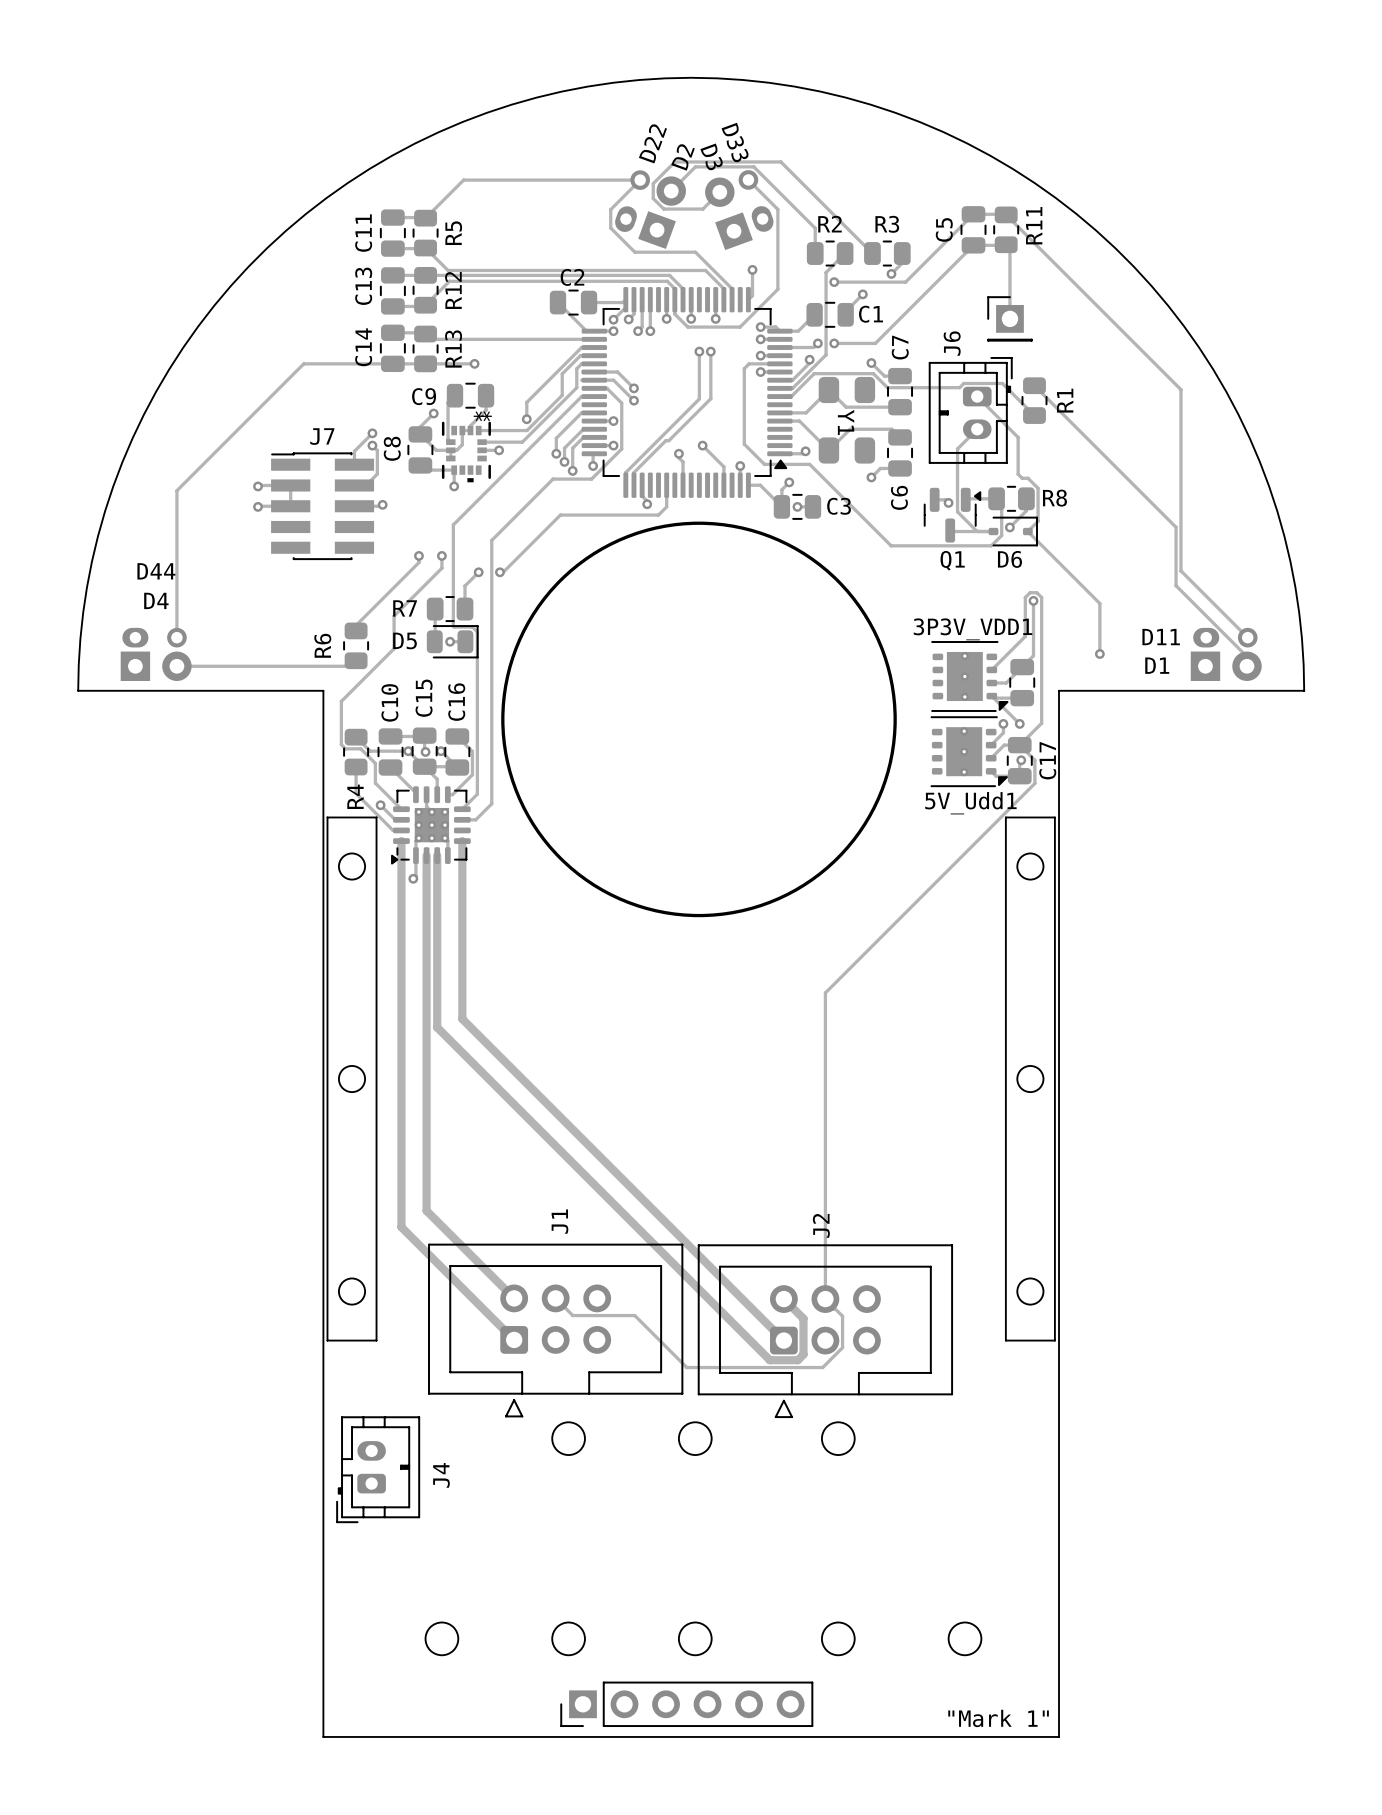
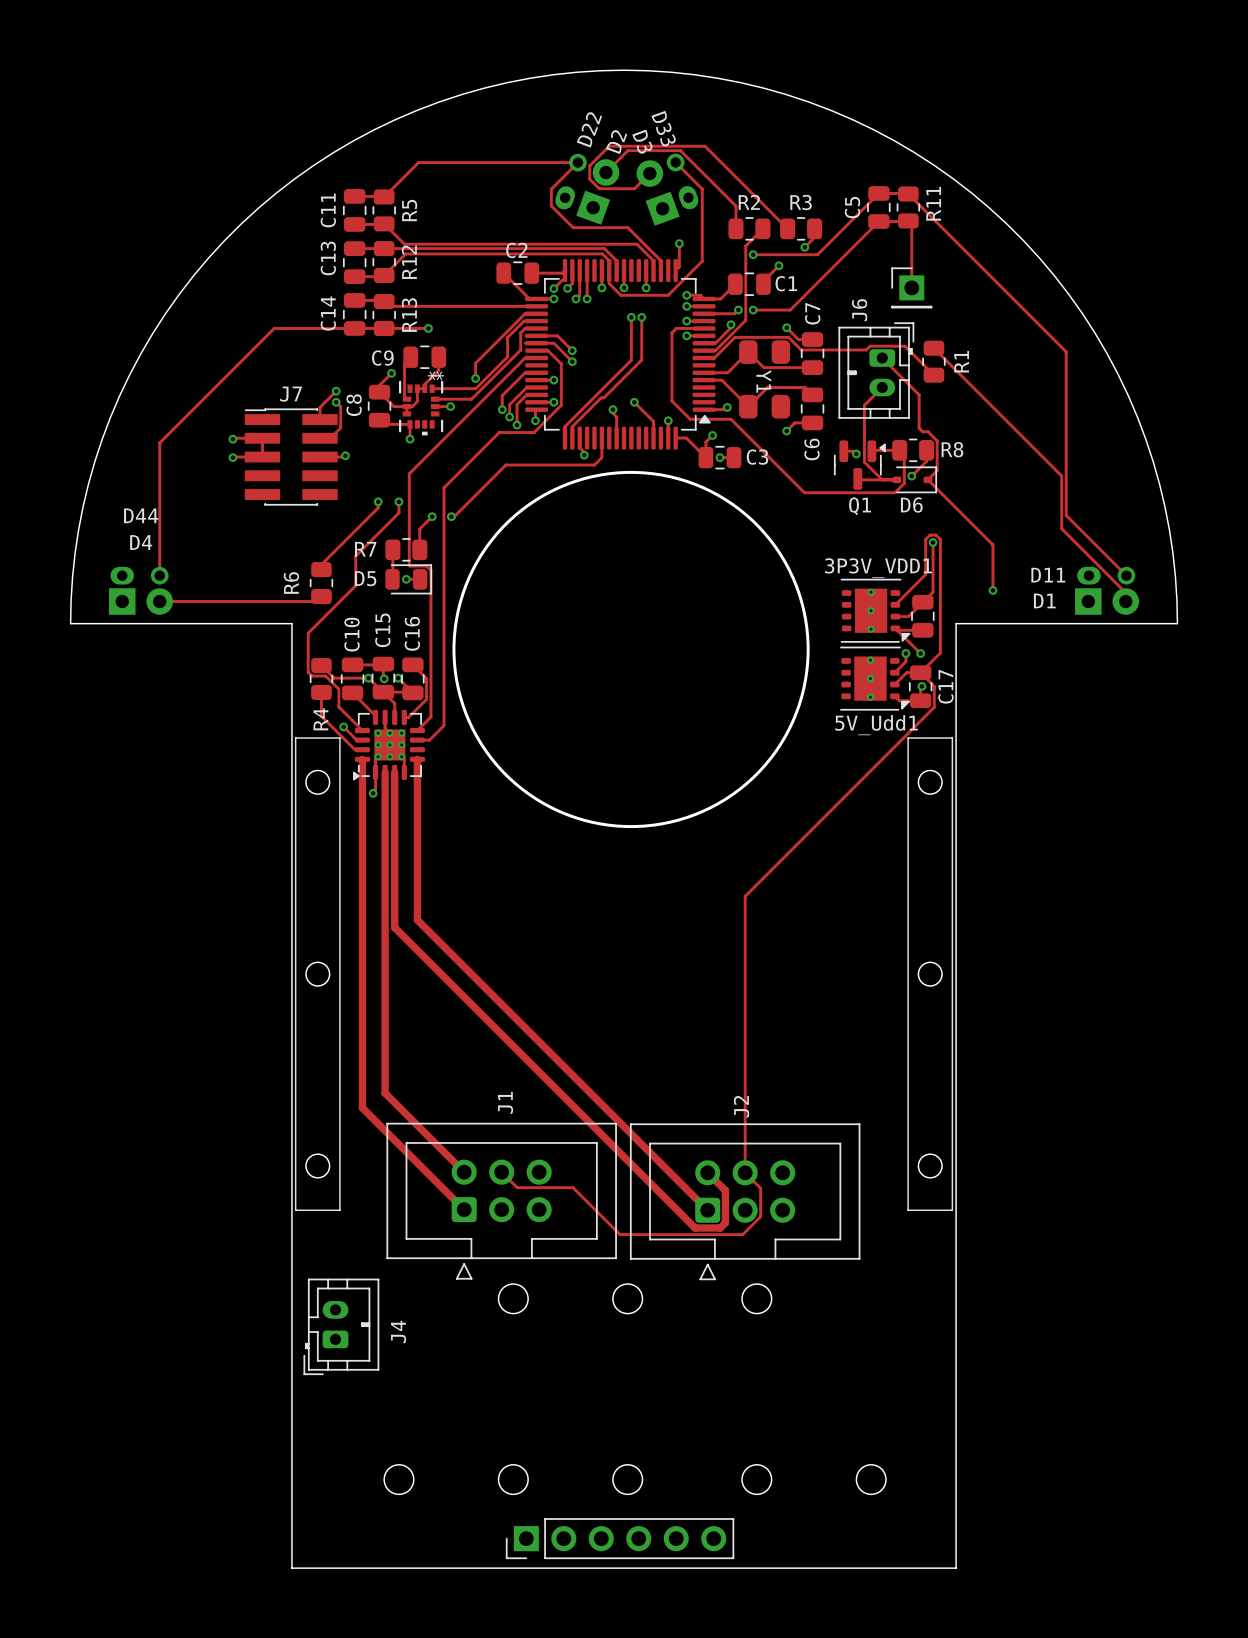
text: "Mark 1" (998, 1718) -> none

